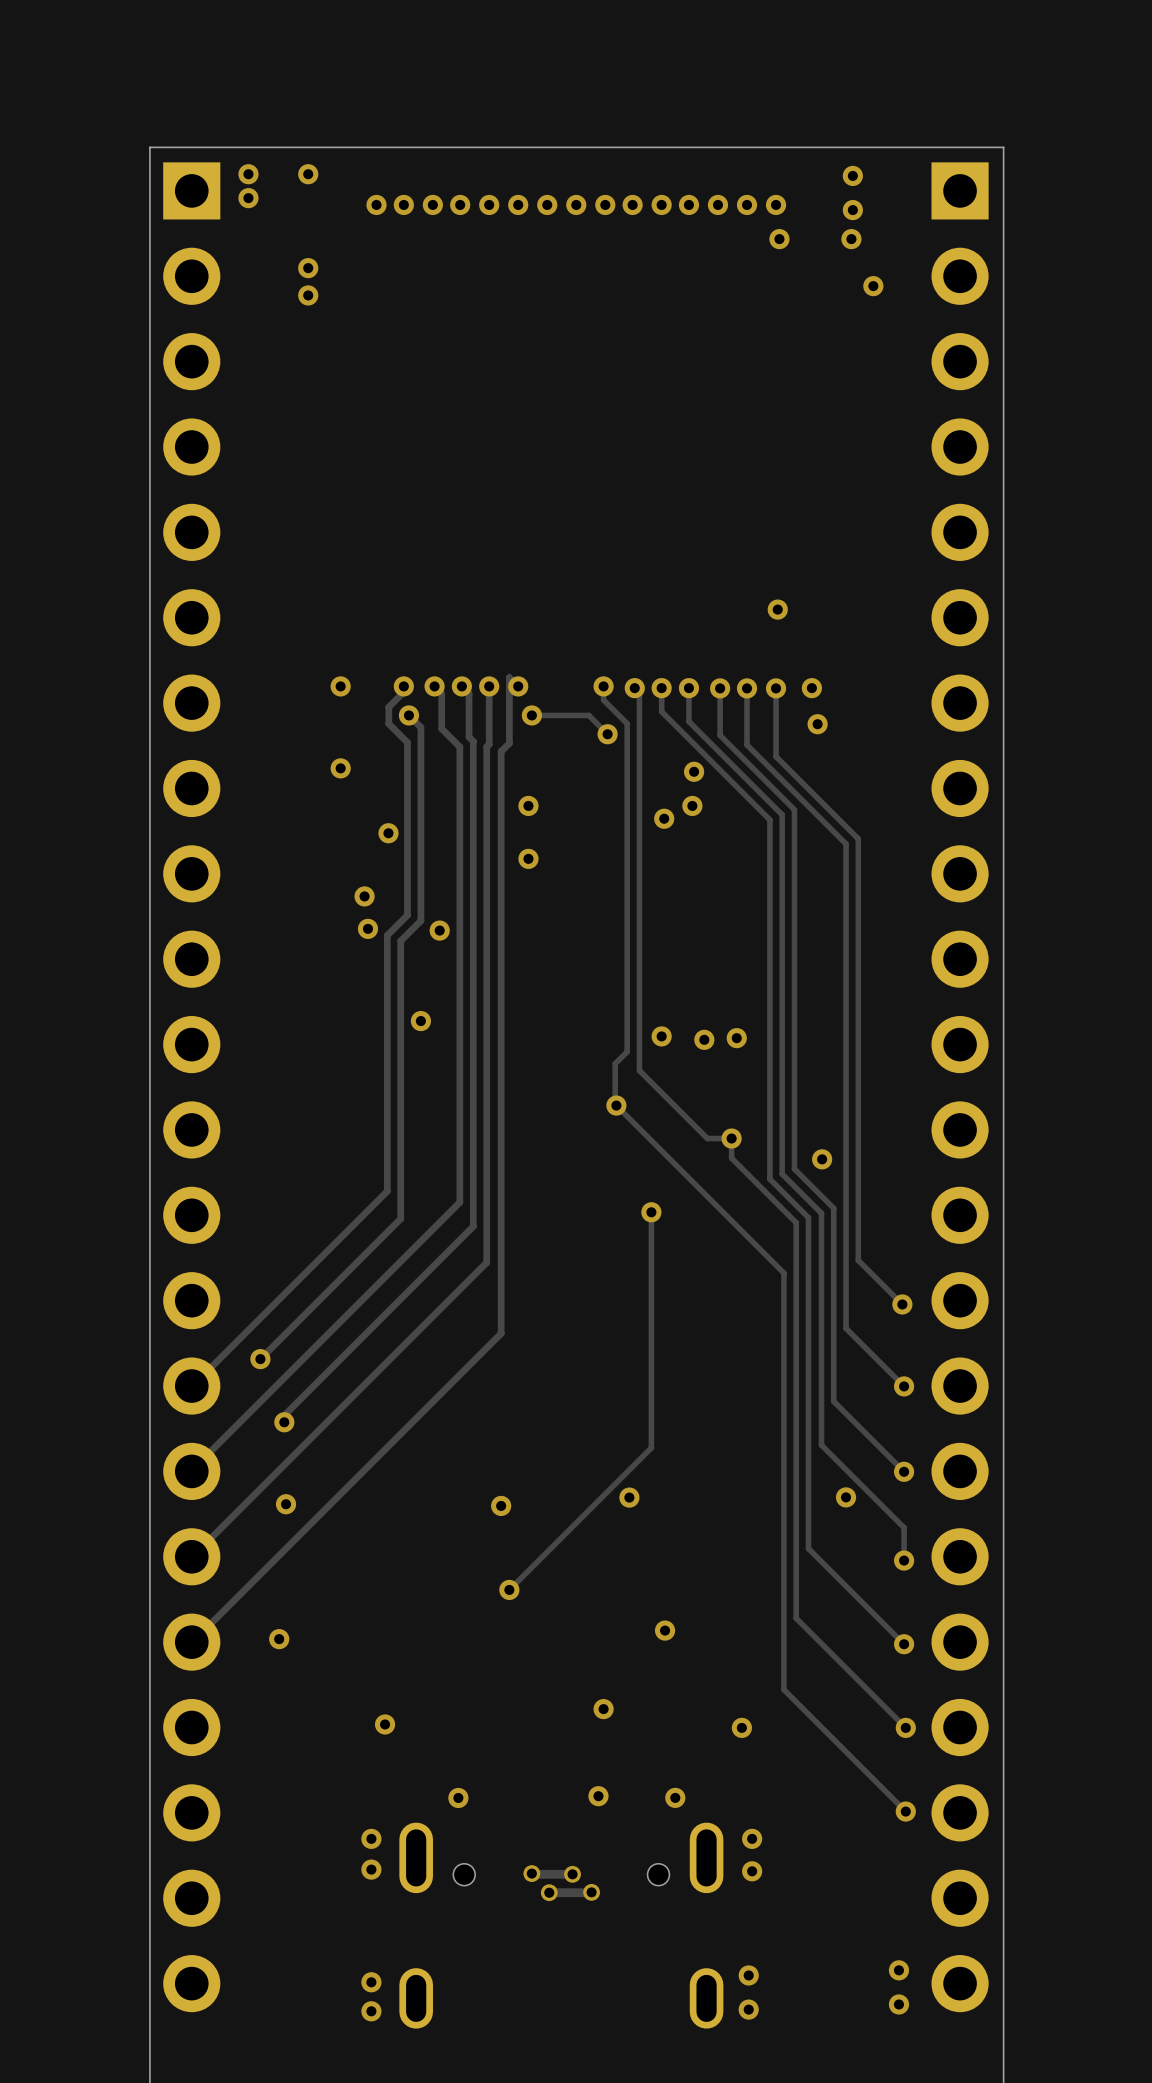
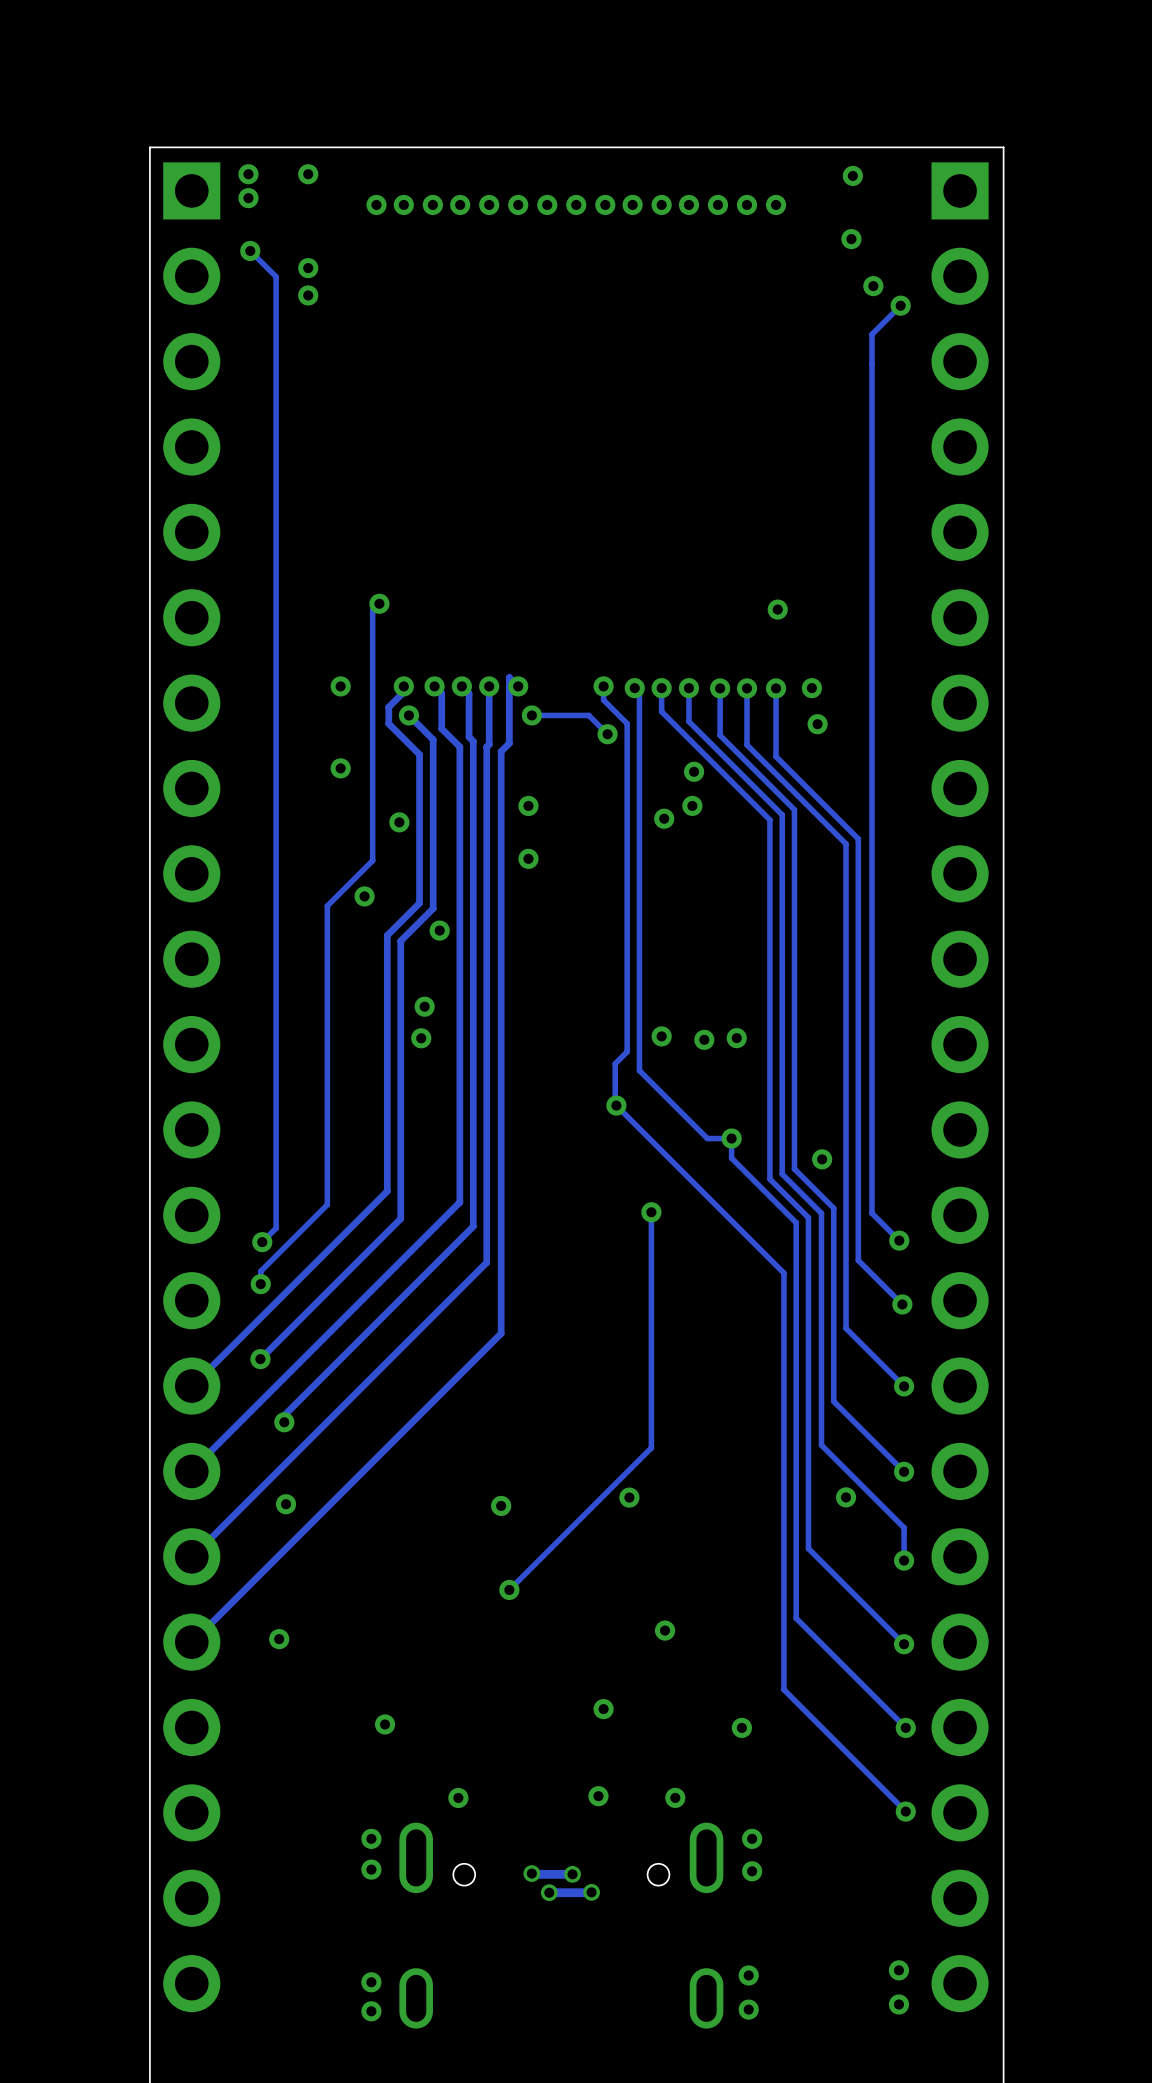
via: (852, 210) -> none
via: (779, 239) -> none
track: none -> (250, 250) (276, 276) (276, 1228) (262, 1242)
via: none -> (250, 250)
track: none -> (900, 305) (871, 334) (871, 1213) (899, 1240)
via: none -> (900, 305)
track: none -> (379, 603) (372, 610) (372, 860) (327, 905) (327, 1204) (260, 1271) (260, 1284)
via: none -> (379, 603)
track: (420, 727) (420, 920) -> (420, 727) (433, 739) (433, 908) (420, 920)
track: (407, 742) (407, 915) -> (407, 742) (419, 754) (419, 903) (407, 915)
via position: (388, 833) -> (399, 822)
via: (367, 928) -> none
via: none -> (424, 1006)
via: (420, 1021) -> none
via: none -> (421, 1038)
via: none -> (899, 1240)
via: none -> (262, 1242)
via: none -> (260, 1284)

